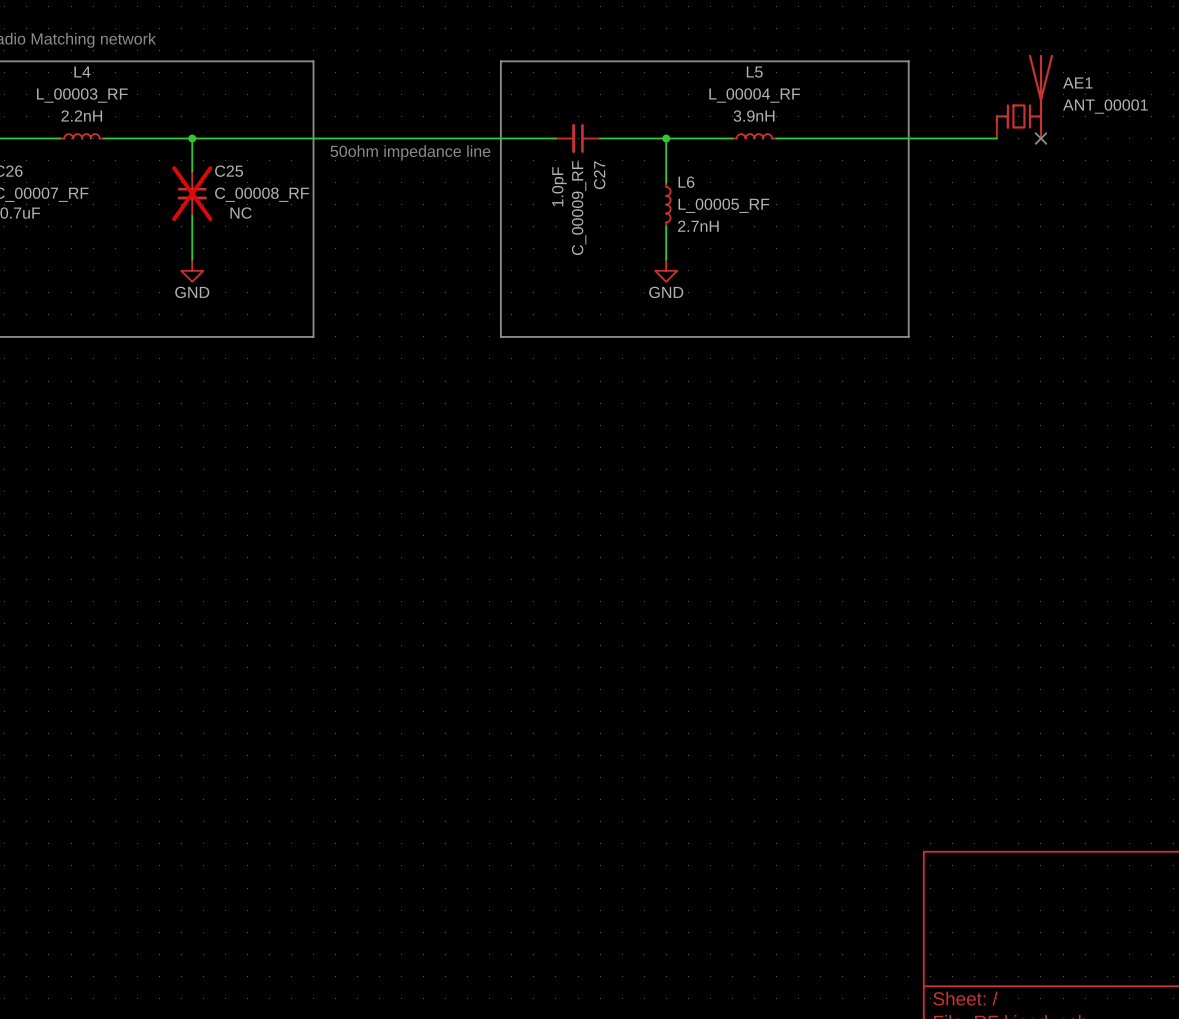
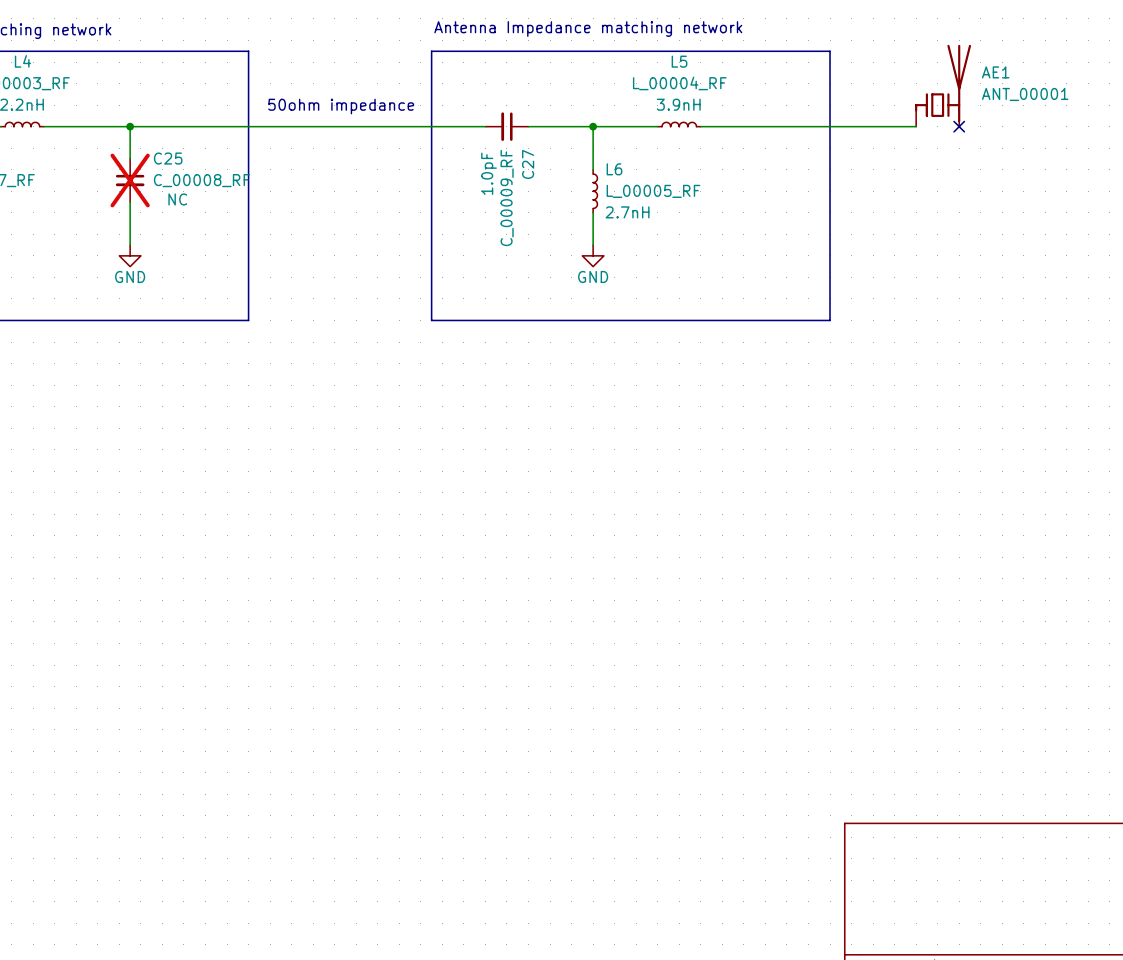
text: none -> Antenna Impedance matching network (588, 29)
text: none -> 50ohm impedance (341, 106)
text: 50ohm impedance line (410, 152) -> none

